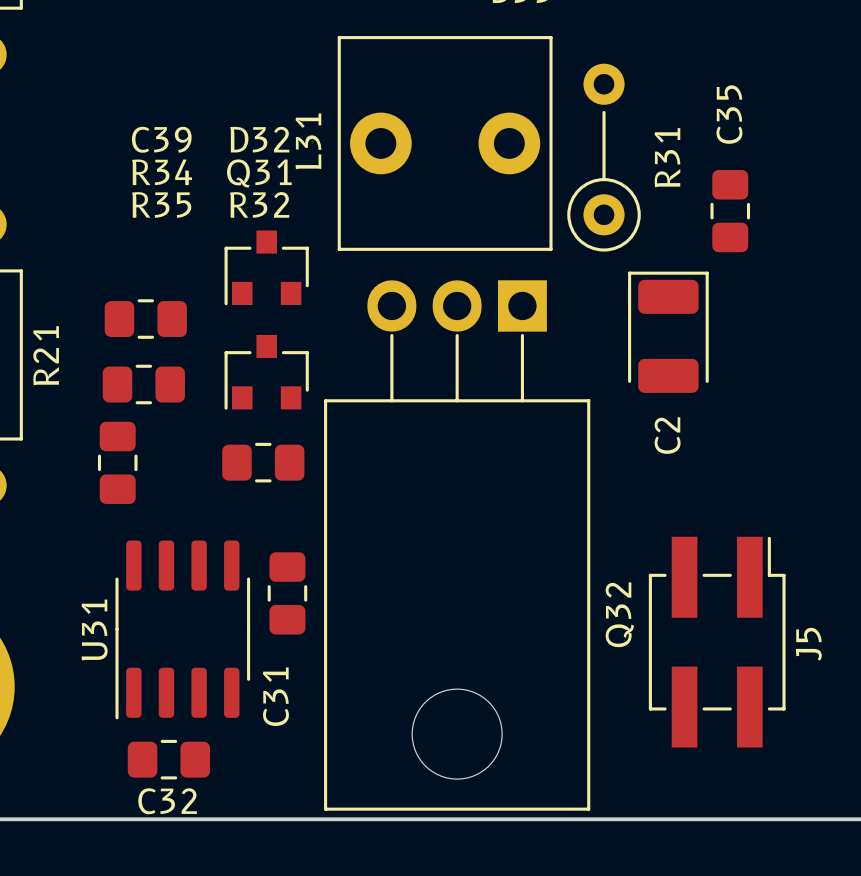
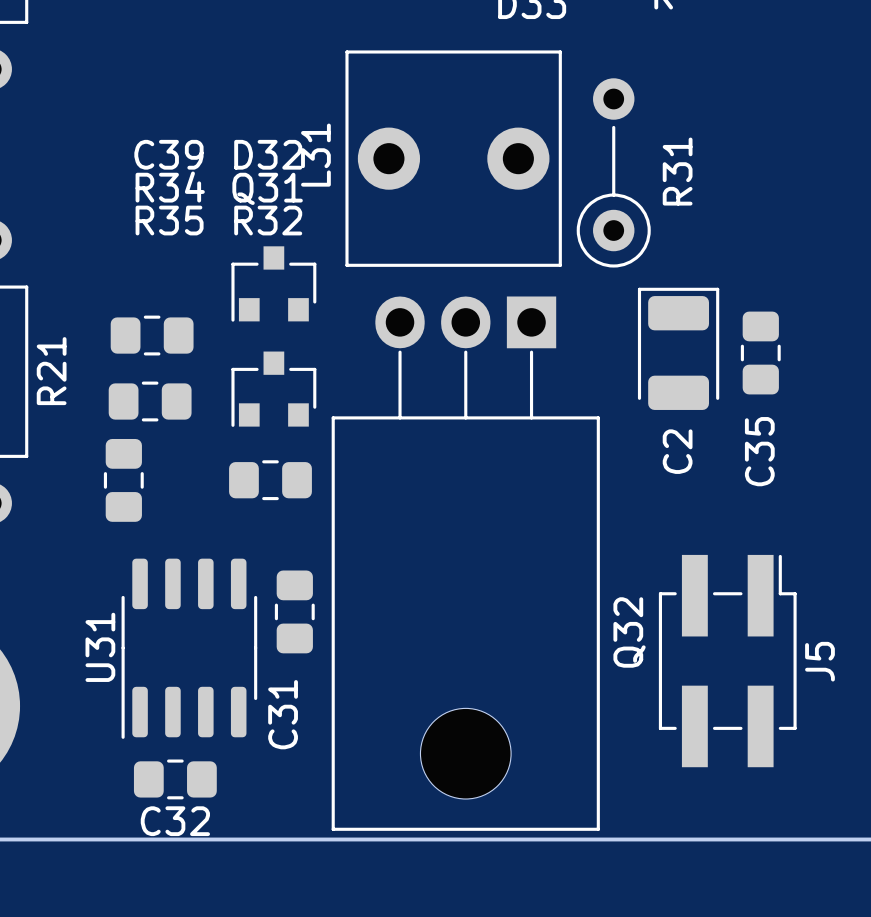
C35 name position: C35 (729, 114) -> C35 (759, 451)
C35 position: (730, 211) -> (760, 353)

